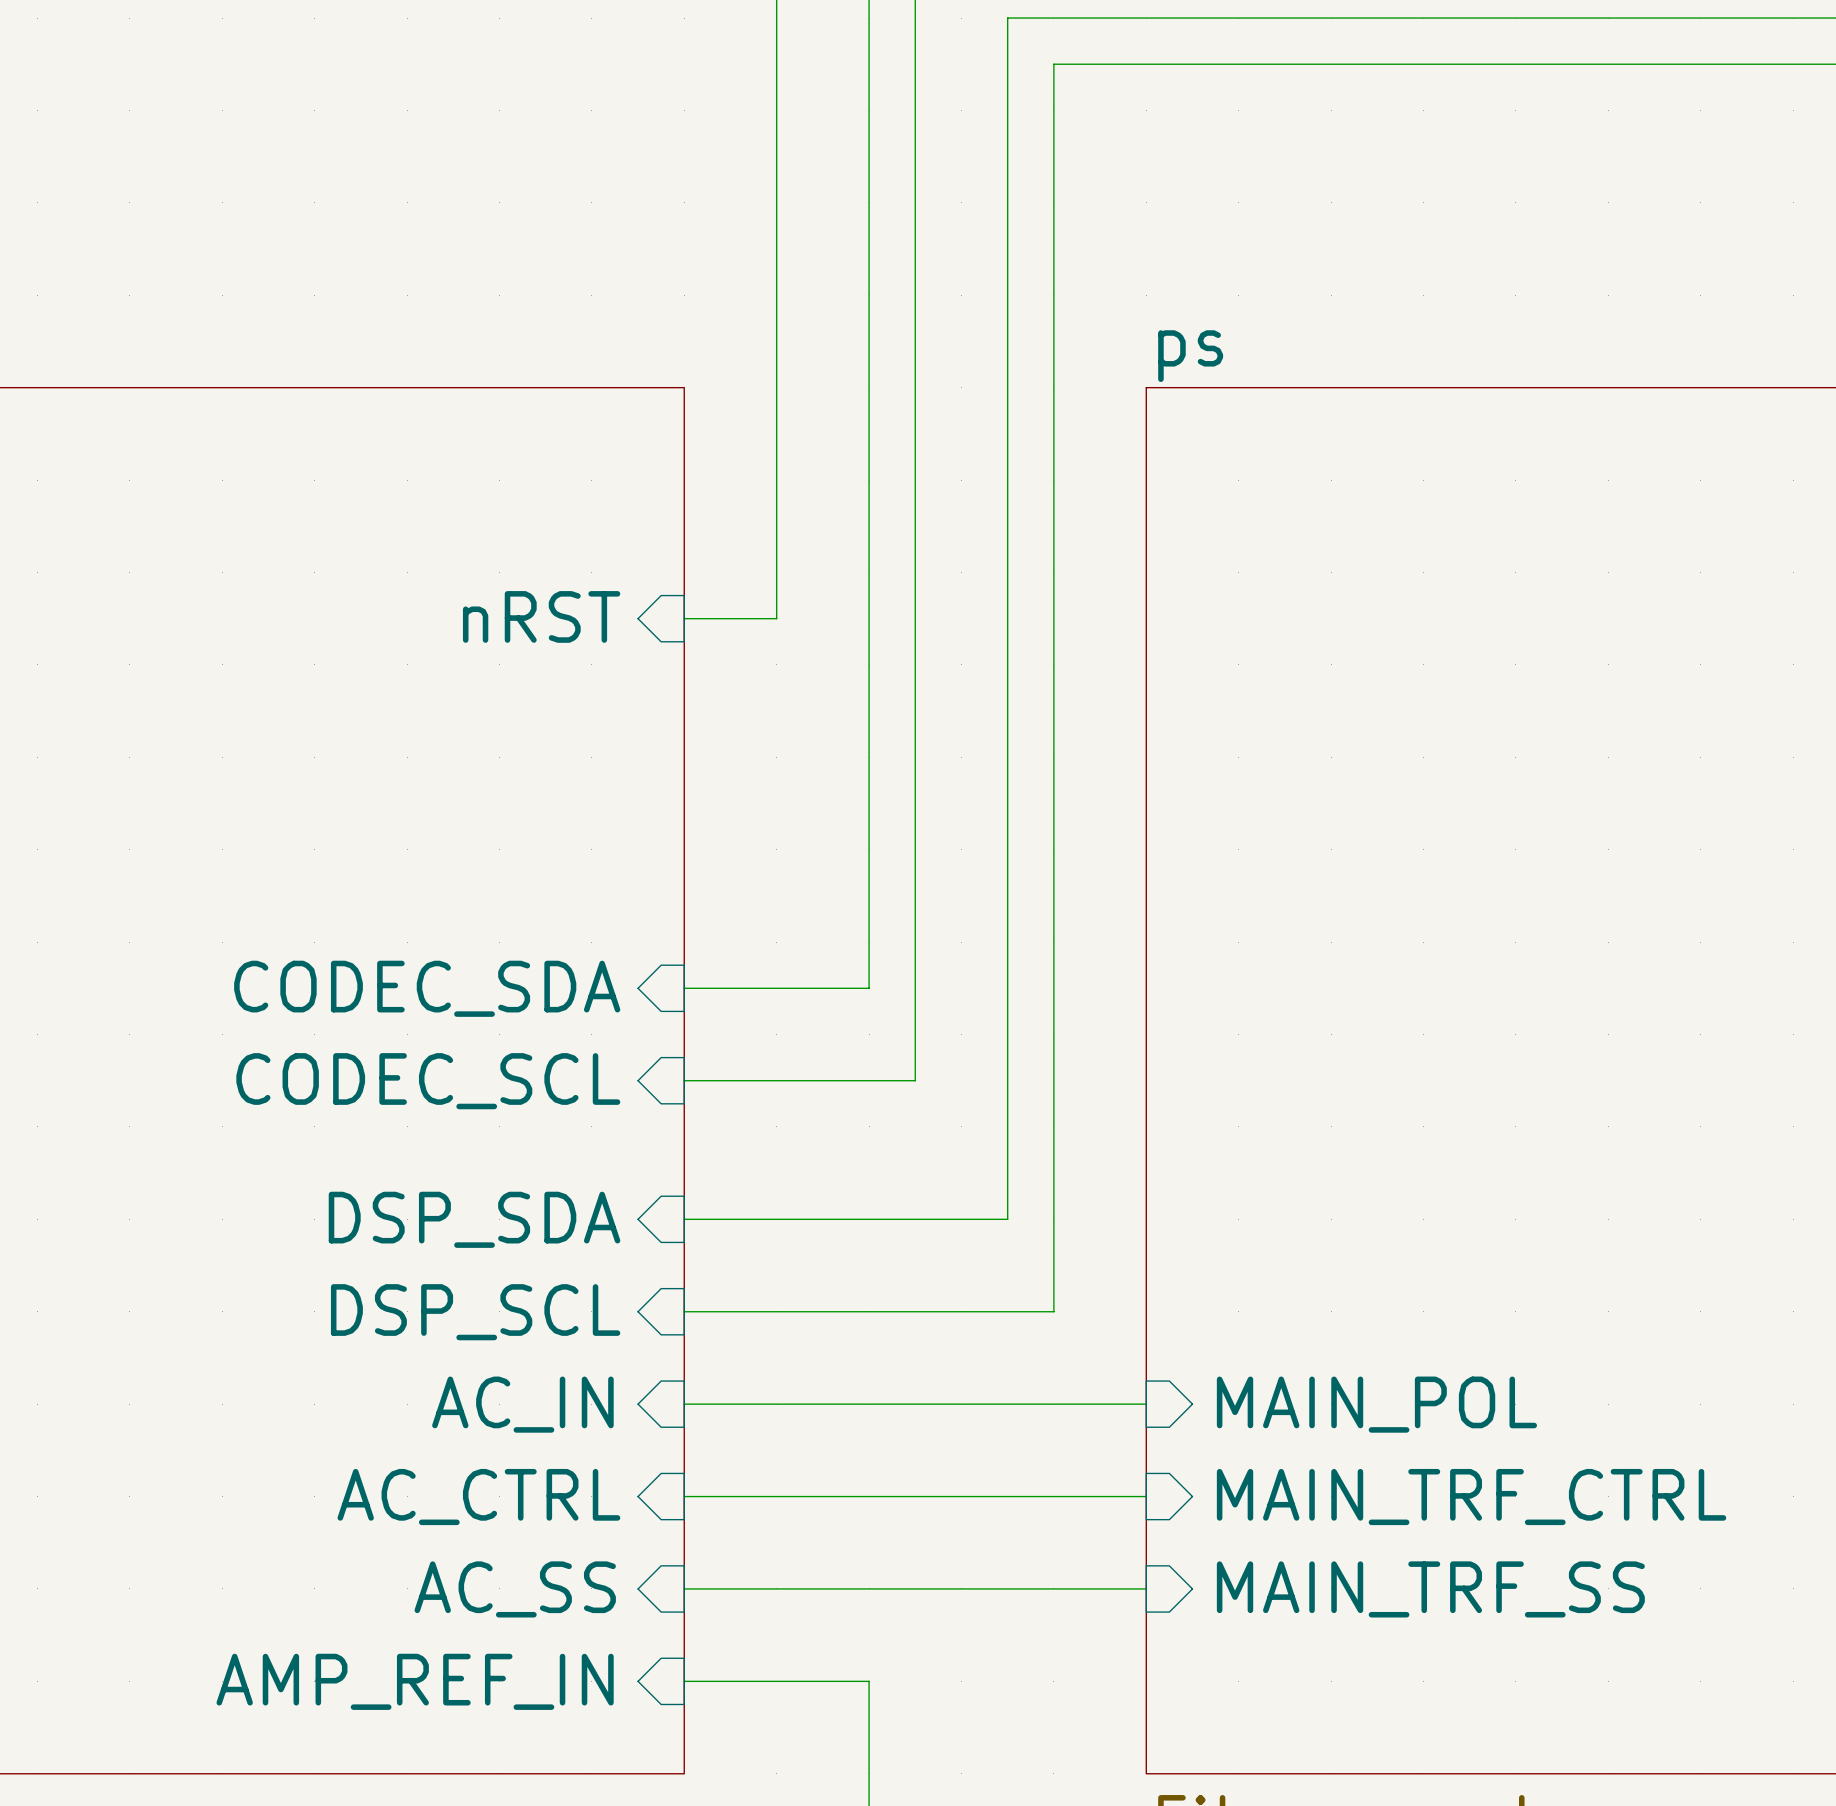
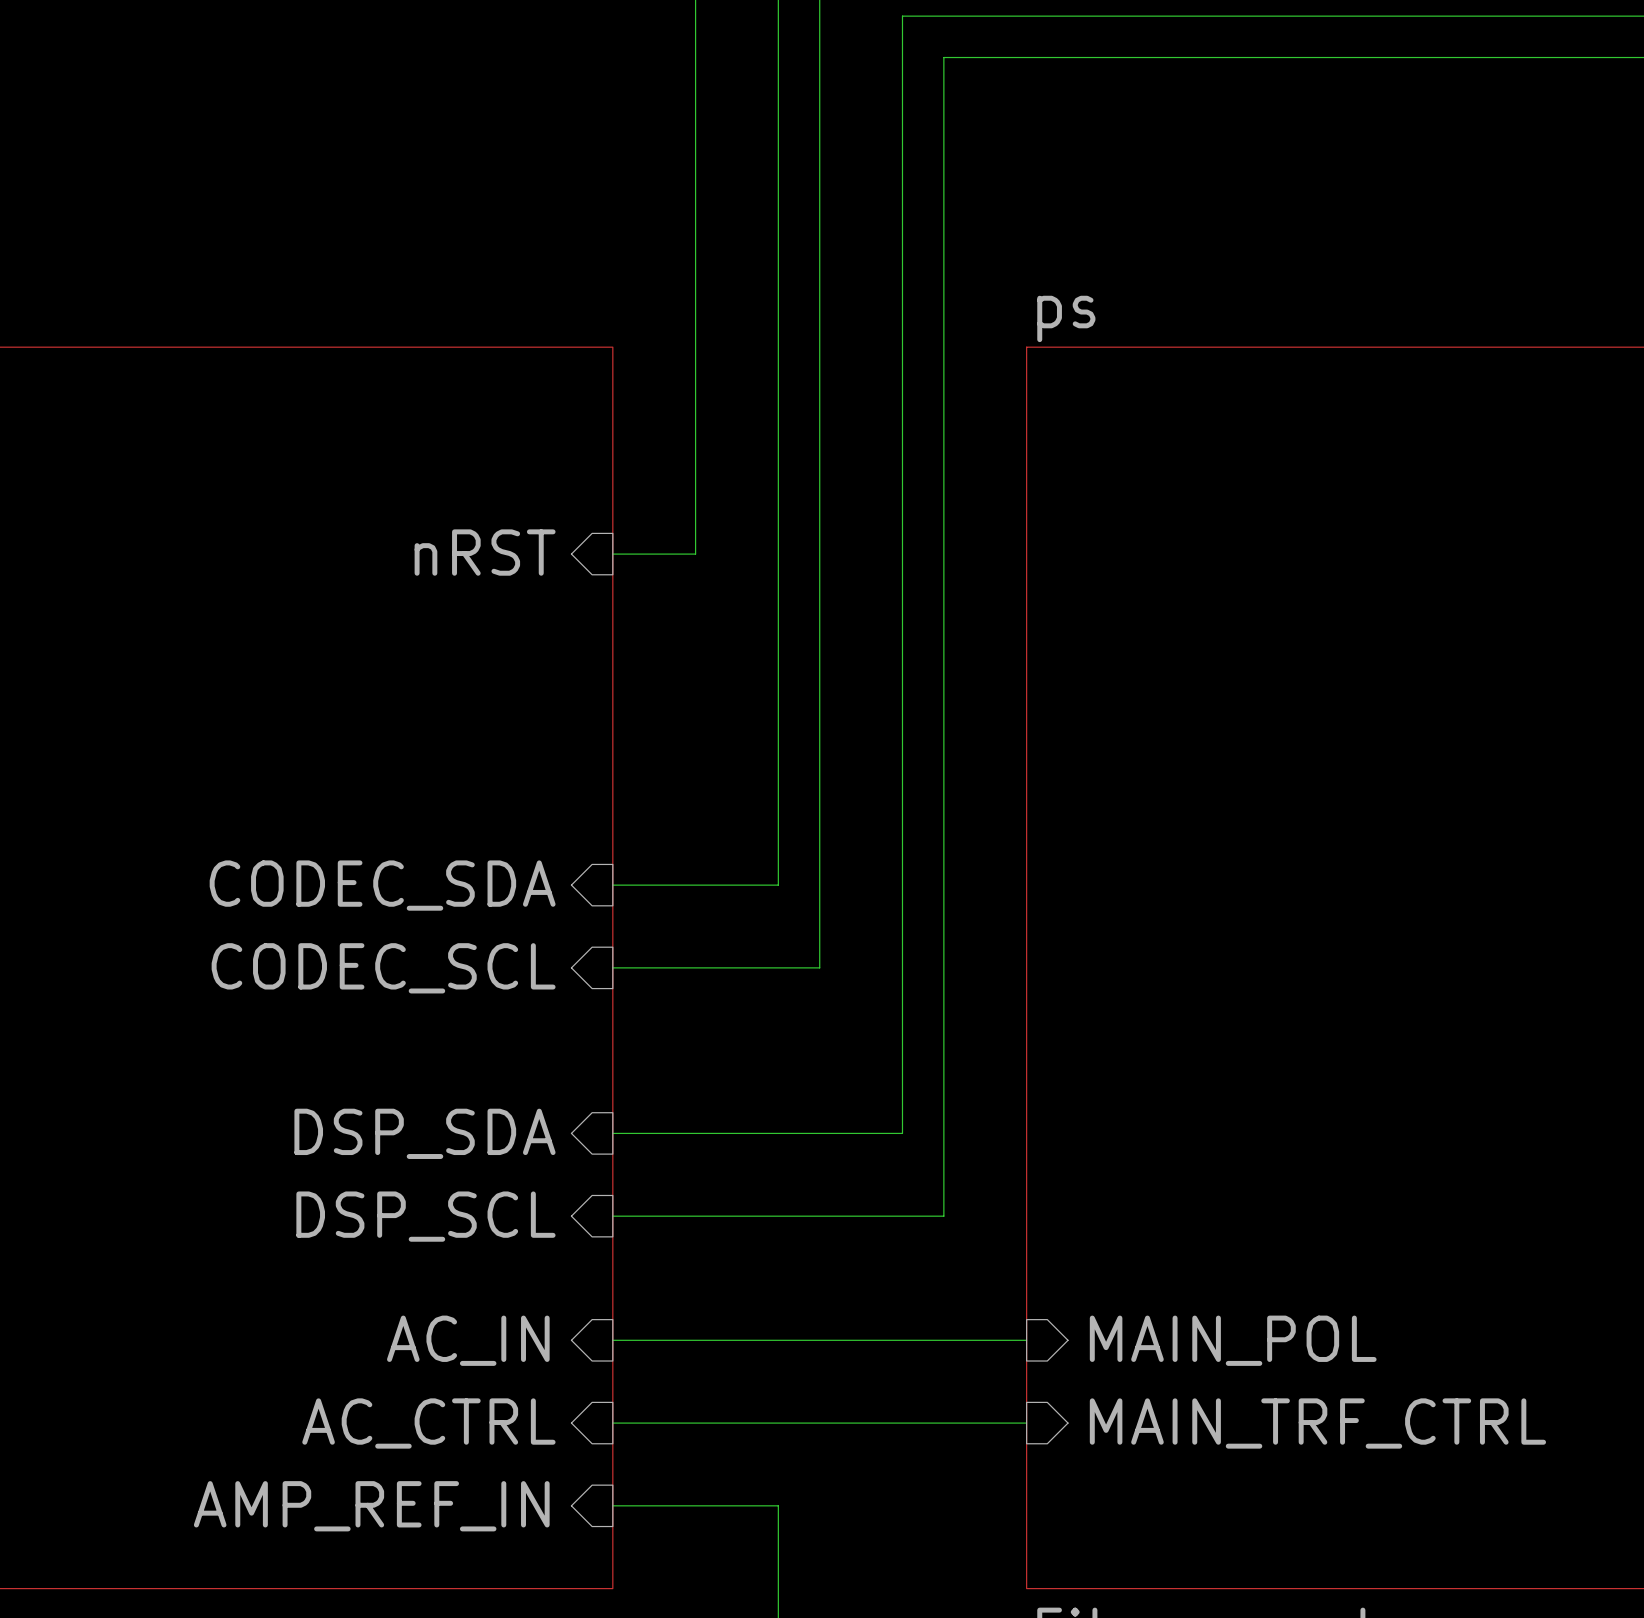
sheet pin position: DSP_SDA (474, 1219) -> DSP_SDA (424, 1133)
wire: (684, 1219) (1007, 1219) -> (612, 1133) (902, 1133) (902, 1092)
wire: (684, 1311) (1053, 1311) -> (612, 1216) (943, 1216) (943, 1174)
sheet pin position: DSP_SCL (475, 1312) -> DSP_SCL (425, 1216)
sheet pin: AC_IN (522, 1404) -> none
wire: (684, 1404) (1146, 1404) -> none
sheet pin: MAIN_POL (1376, 1404) -> none
sheet pin: AC_CTRL (478, 1497) -> AC_IN (468, 1340)
sheet pin: MAIN_TRF_CTRL (1471, 1497) -> MAIN_POL (1233, 1340)
sheet pin: AC_SS (515, 1589) -> AC_CTRL (428, 1423)
sheet pin: MAIN_TRF_SS (1430, 1589) -> MAIN_TRF_CTRL (1317, 1423)

